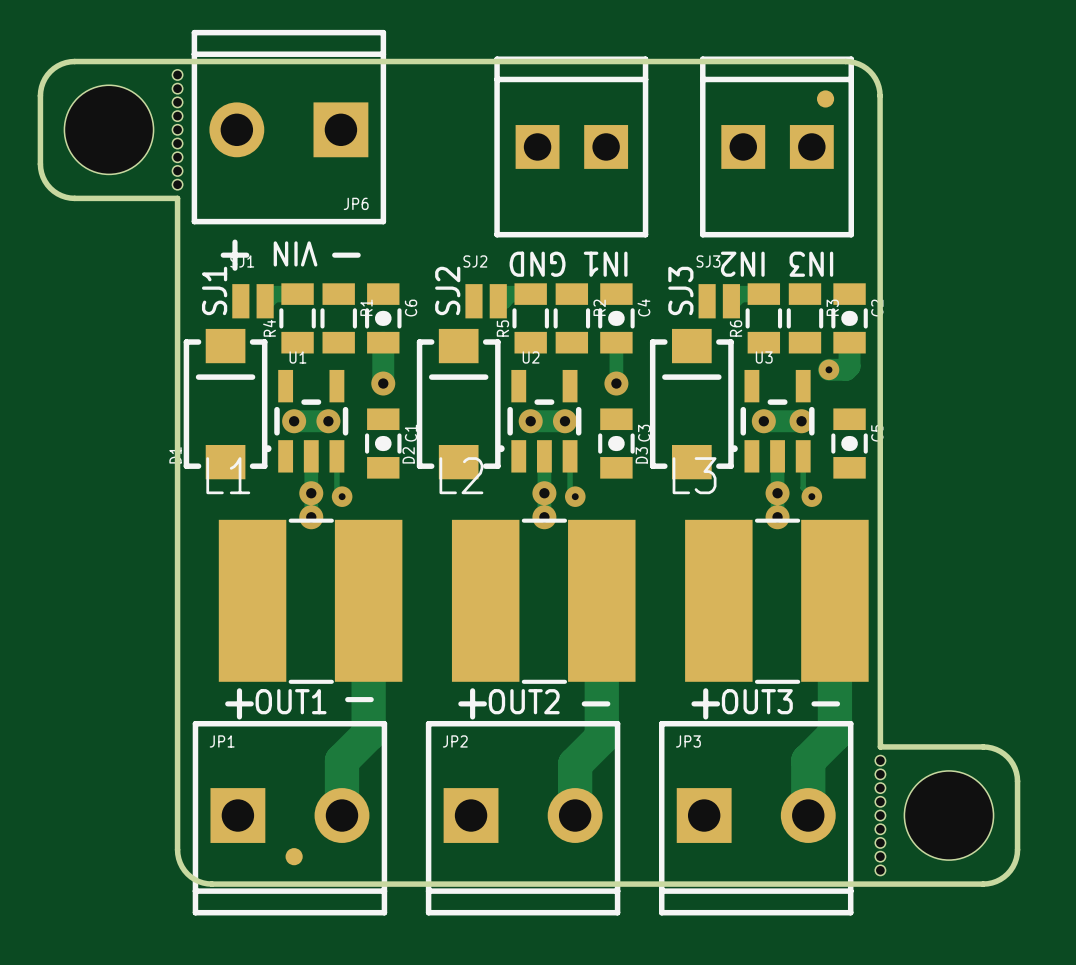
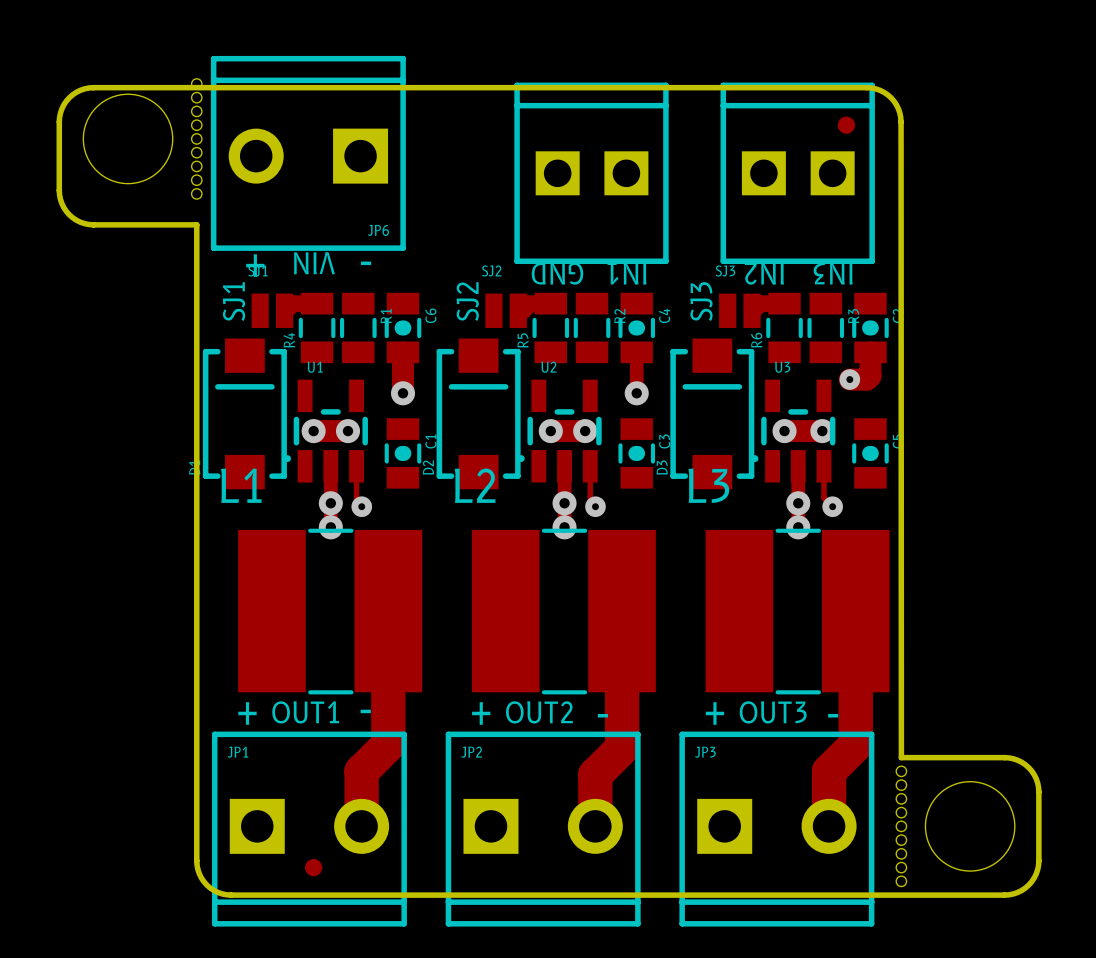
part position: (825, 98) -> (846, 125)
board edge: (40, 112) (40, 91) (45, 78) (57, 66) (74, 61) (845, 61) (862, 66) (875, 78) (879, 91) (880, 112) -> (59, 122) (61, 108) (69, 97) (80, 90) (93, 87) (866, 87) (879, 90) (890, 97) (898, 108) (901, 122)
JP6 position: (288, 127) -> (308, 153)
part position: (571, 146) -> (591, 173)
part position: (777, 146) -> (797, 173)
board edge: (40, 164) (45, 181) (53, 191) (61, 195) (74, 198) (177, 198) (177, 215) -> (59, 173) (59, 194) (61, 203) (69, 214) (80, 222) (93, 224) (196, 224)

